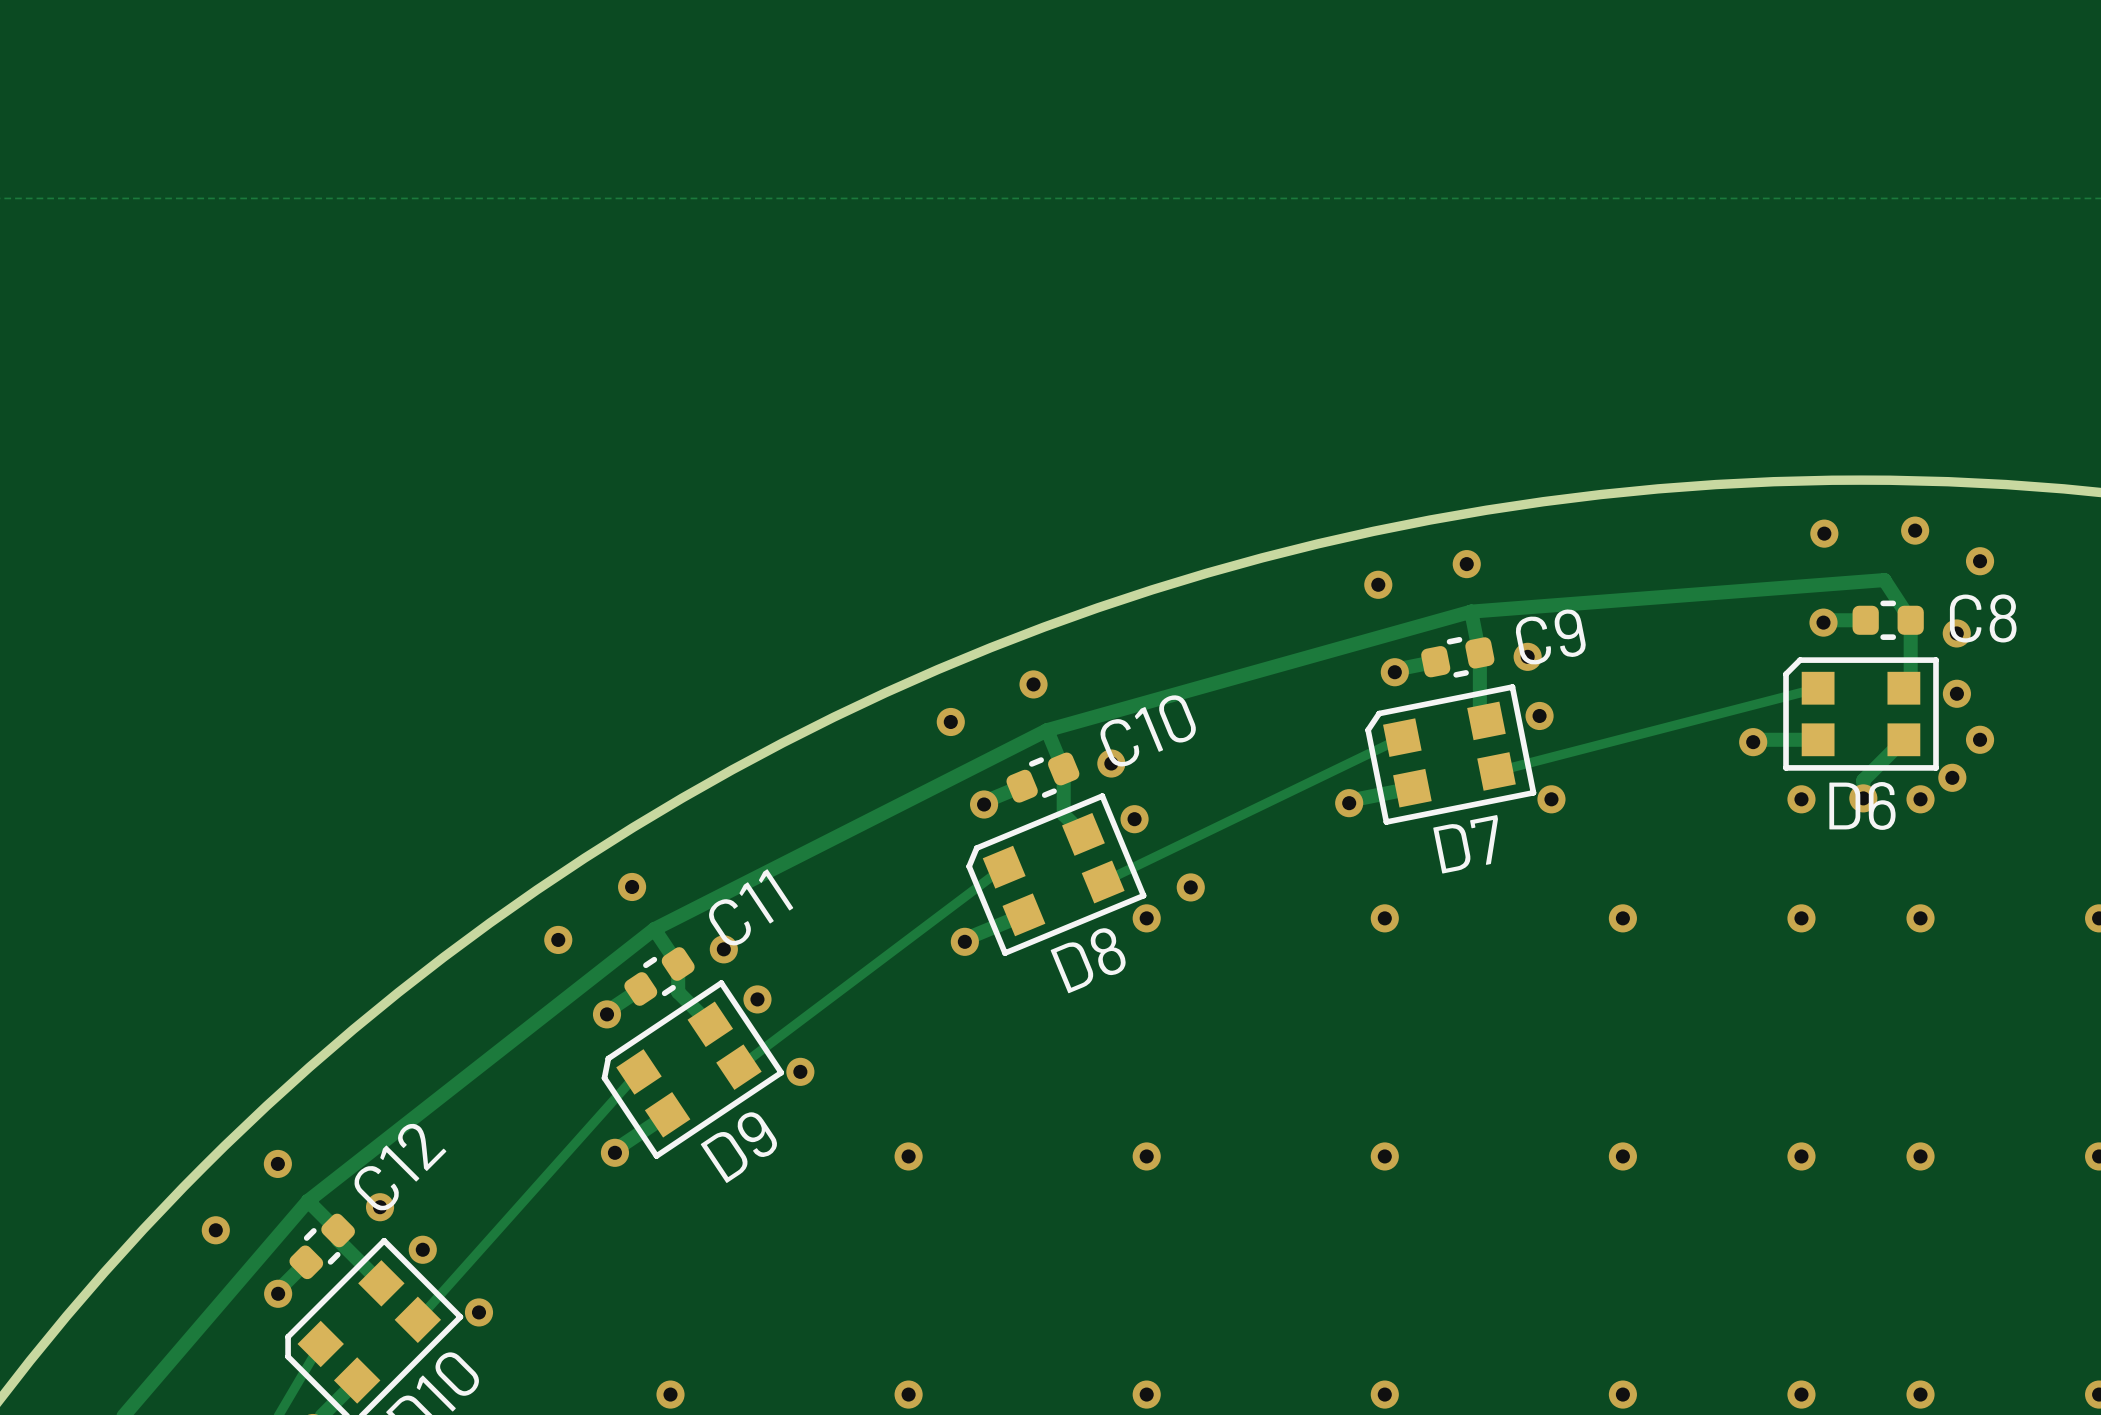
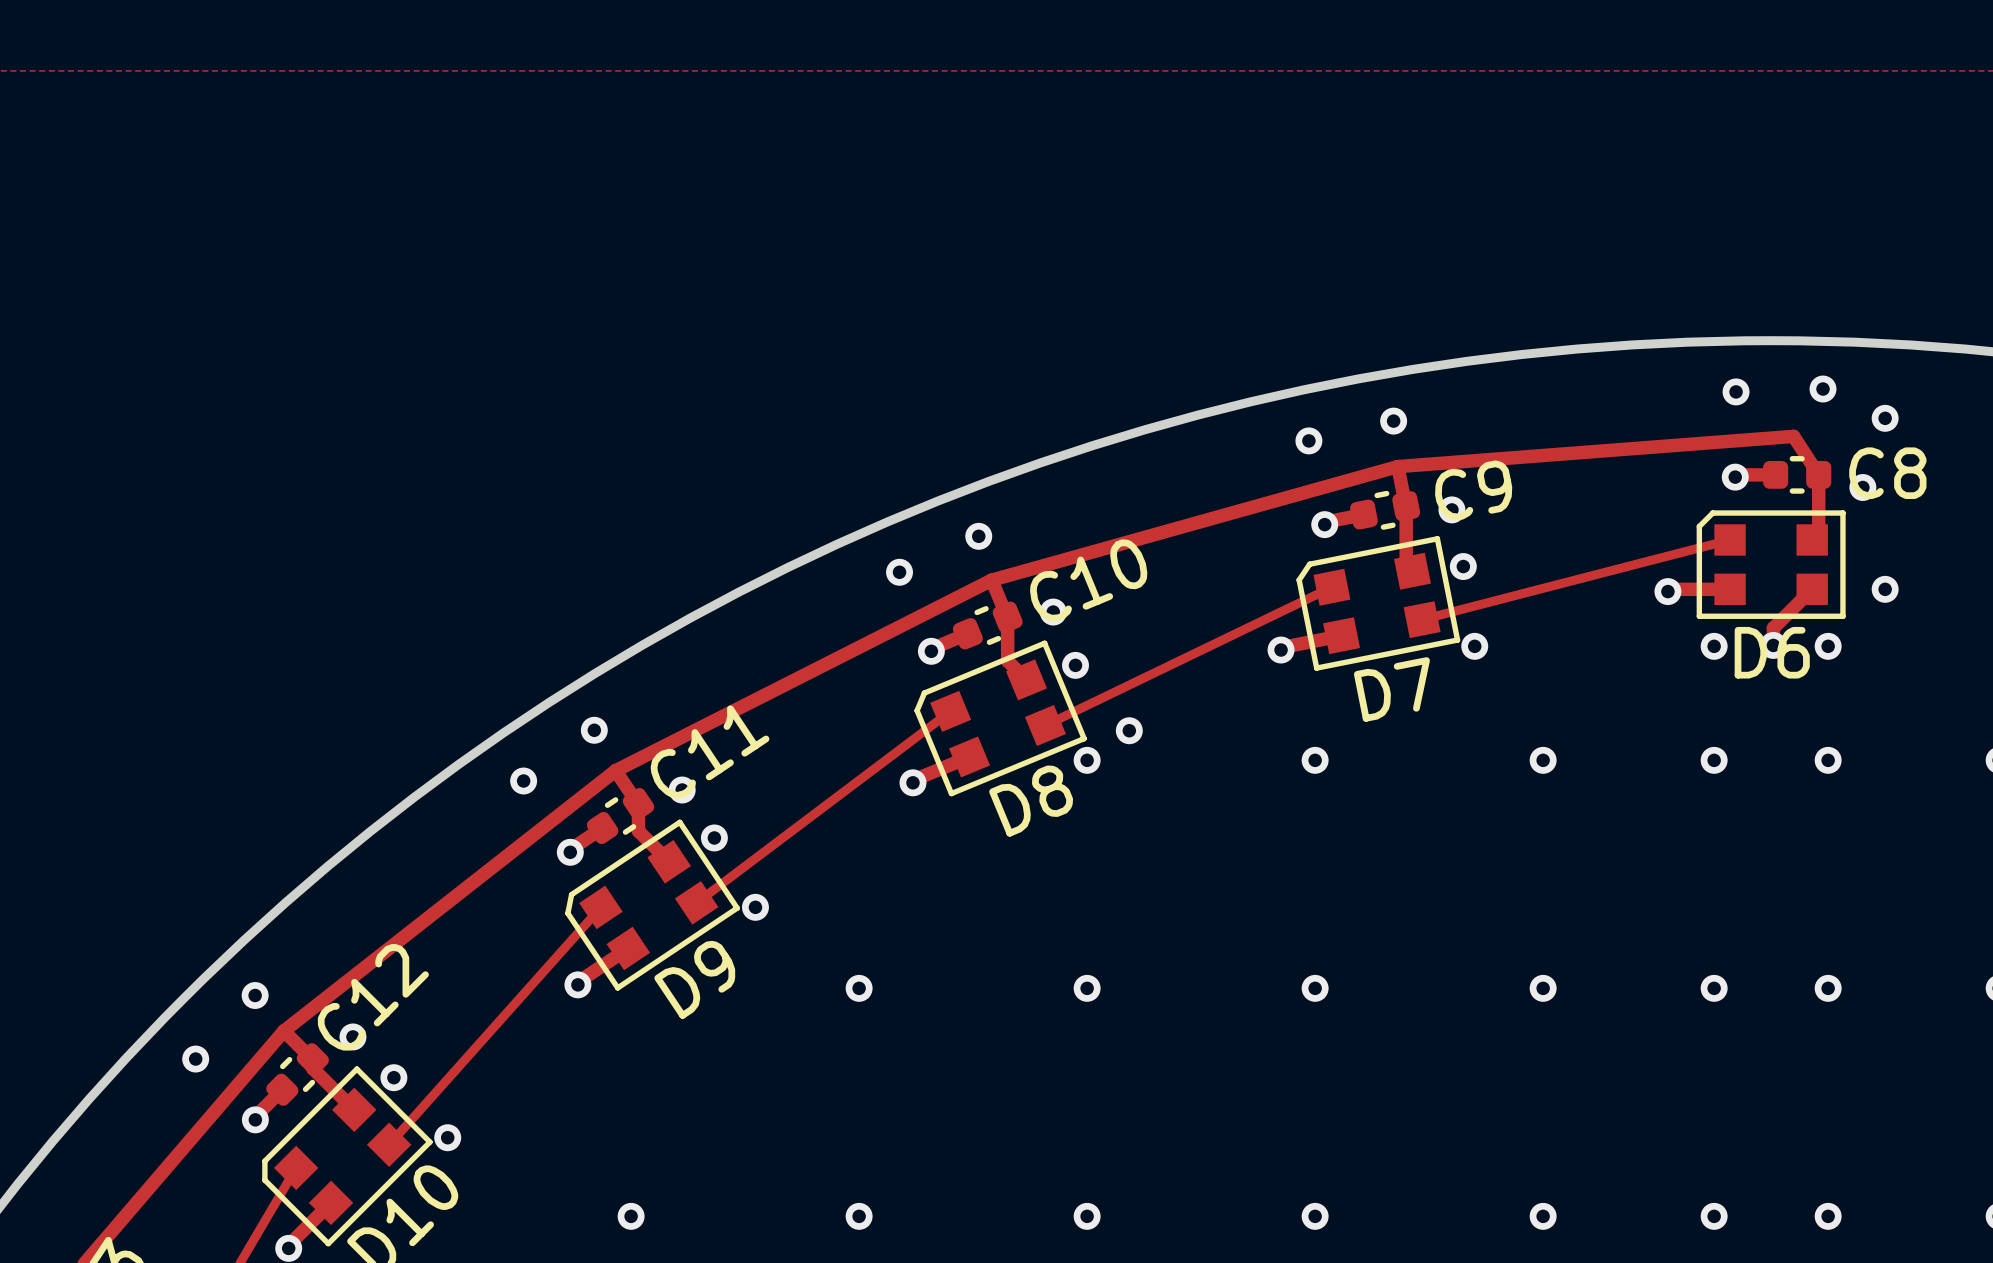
via: (1956, 693) -> none
via: (1952, 777) -> none

